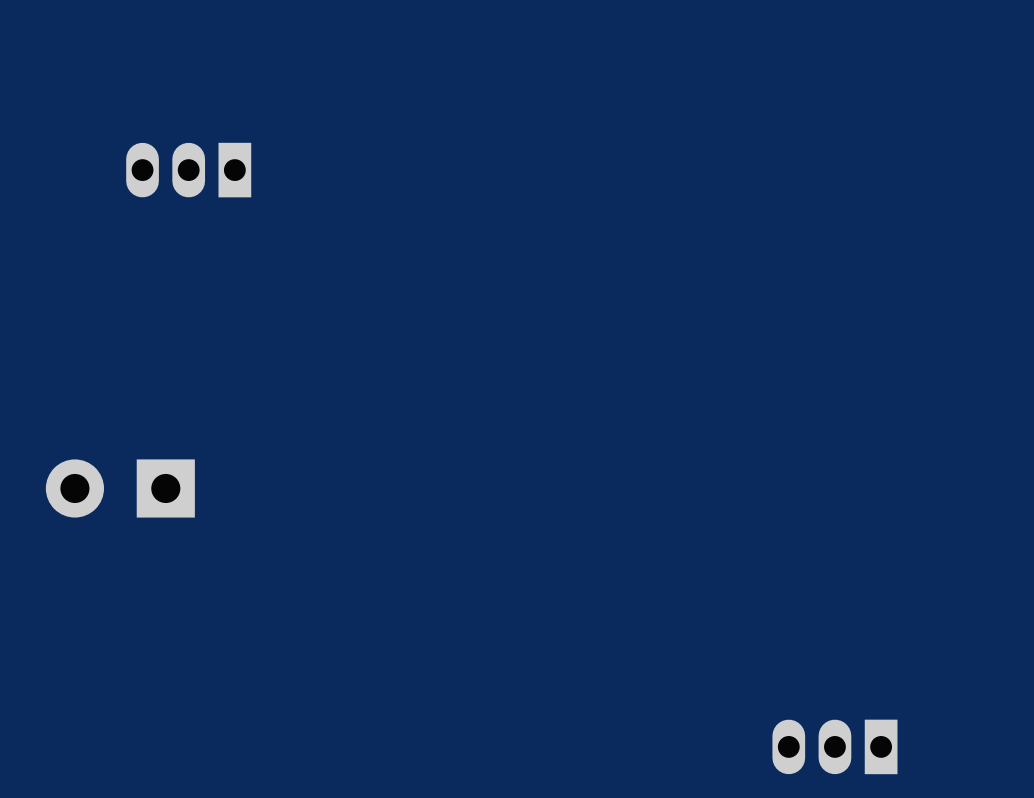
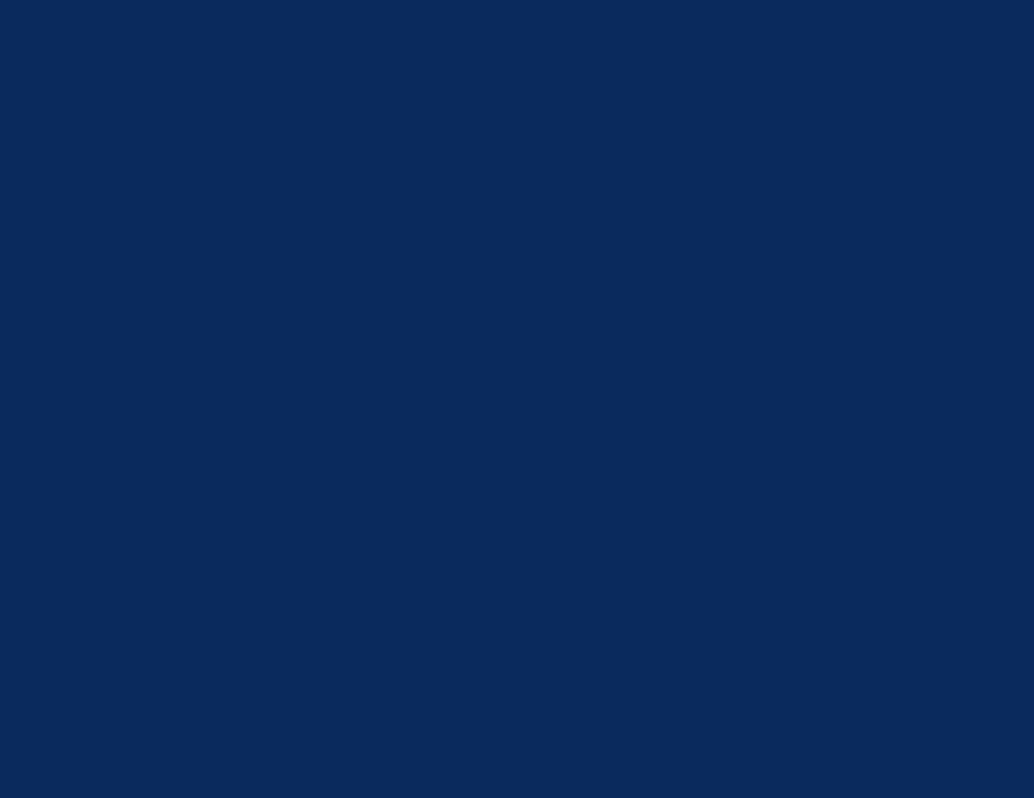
part: (188, 170) -> none
part: (120, 488) -> none
part: (834, 746) -> none

